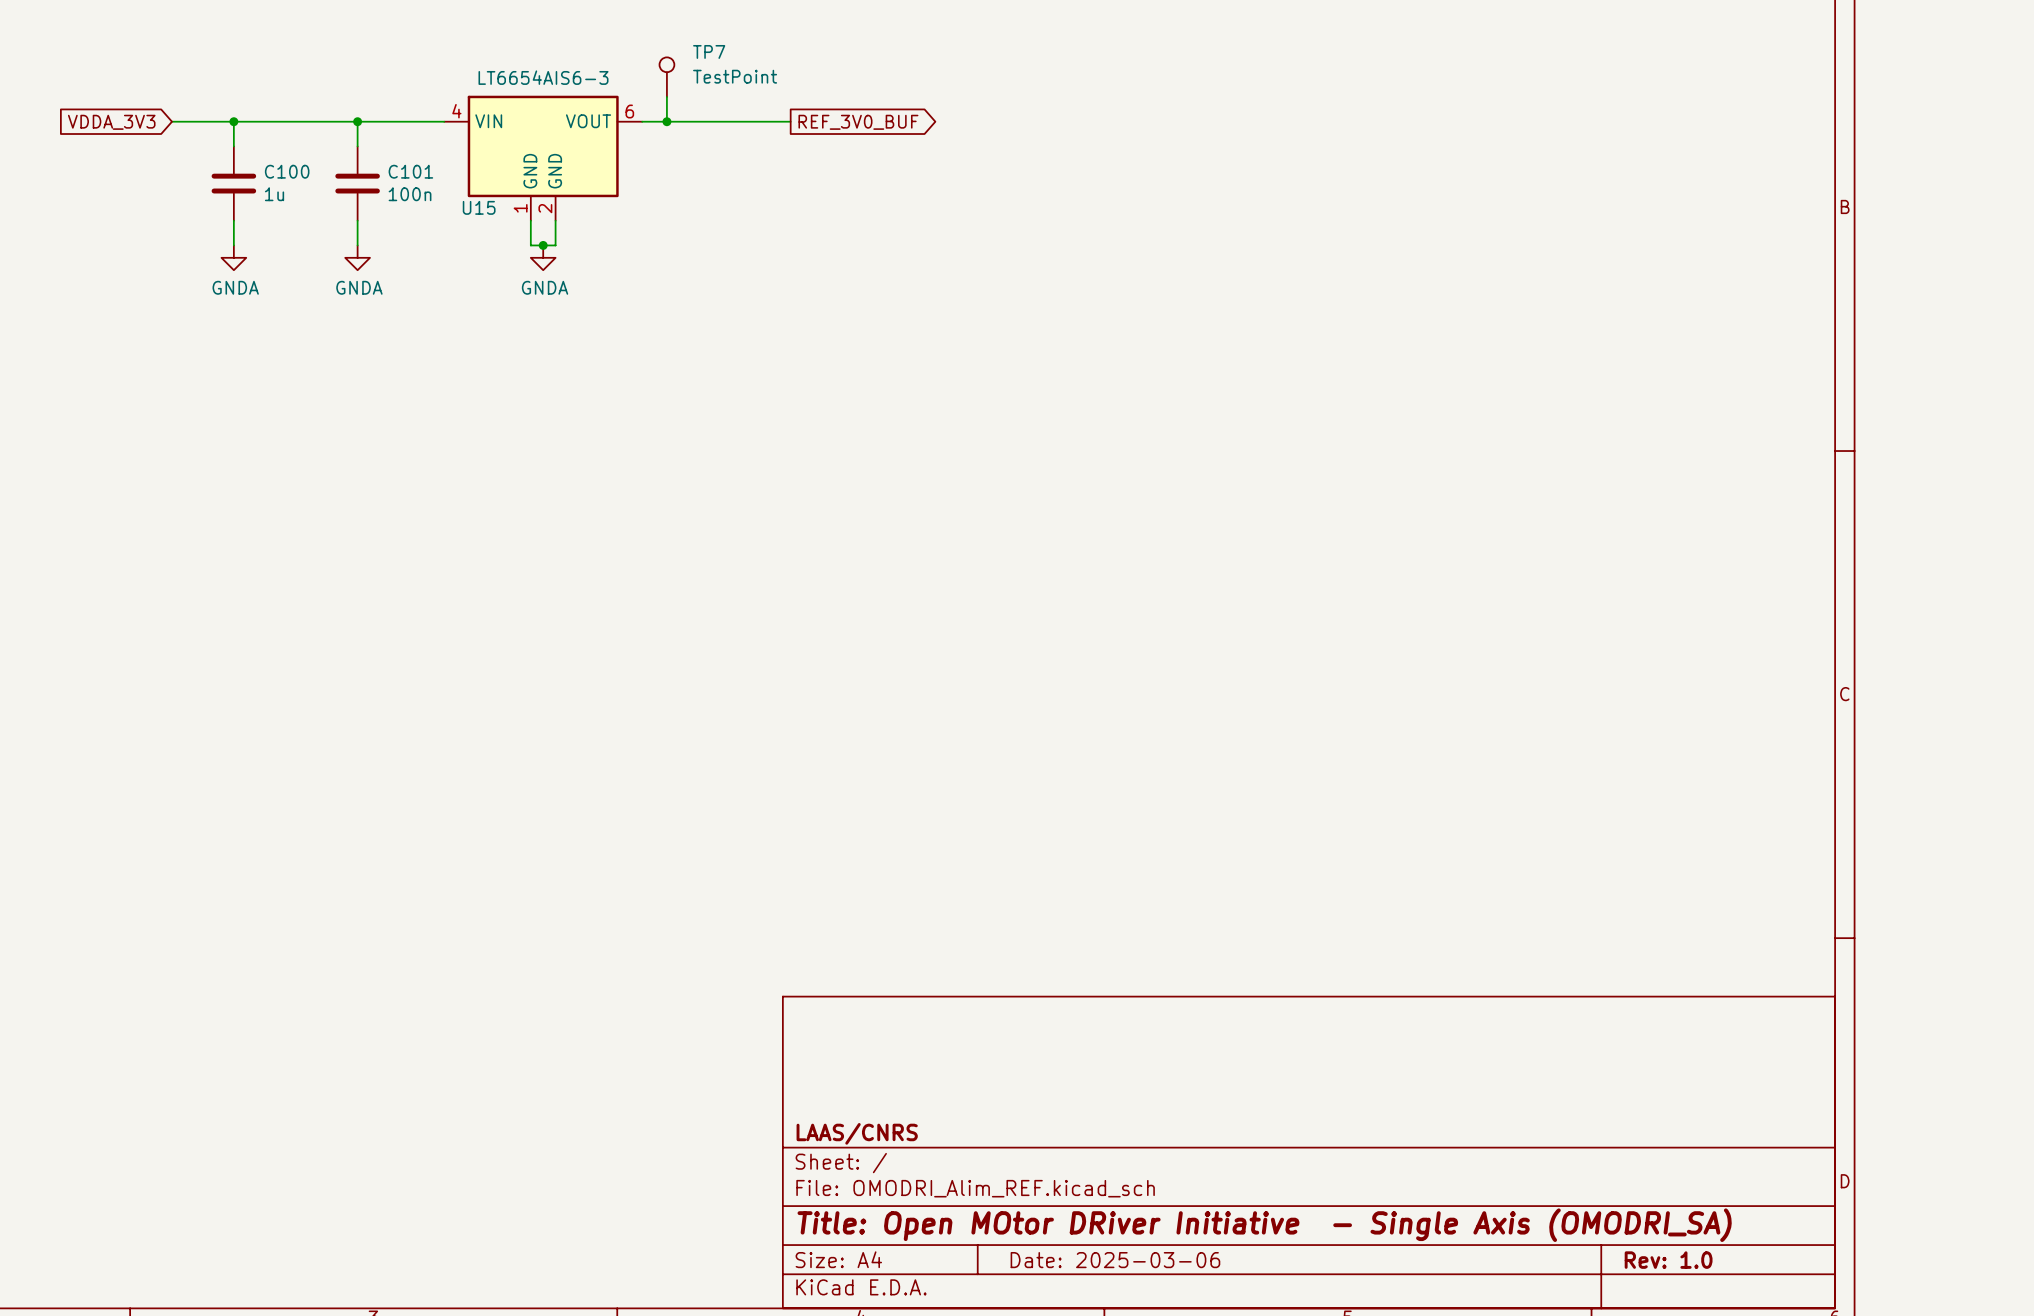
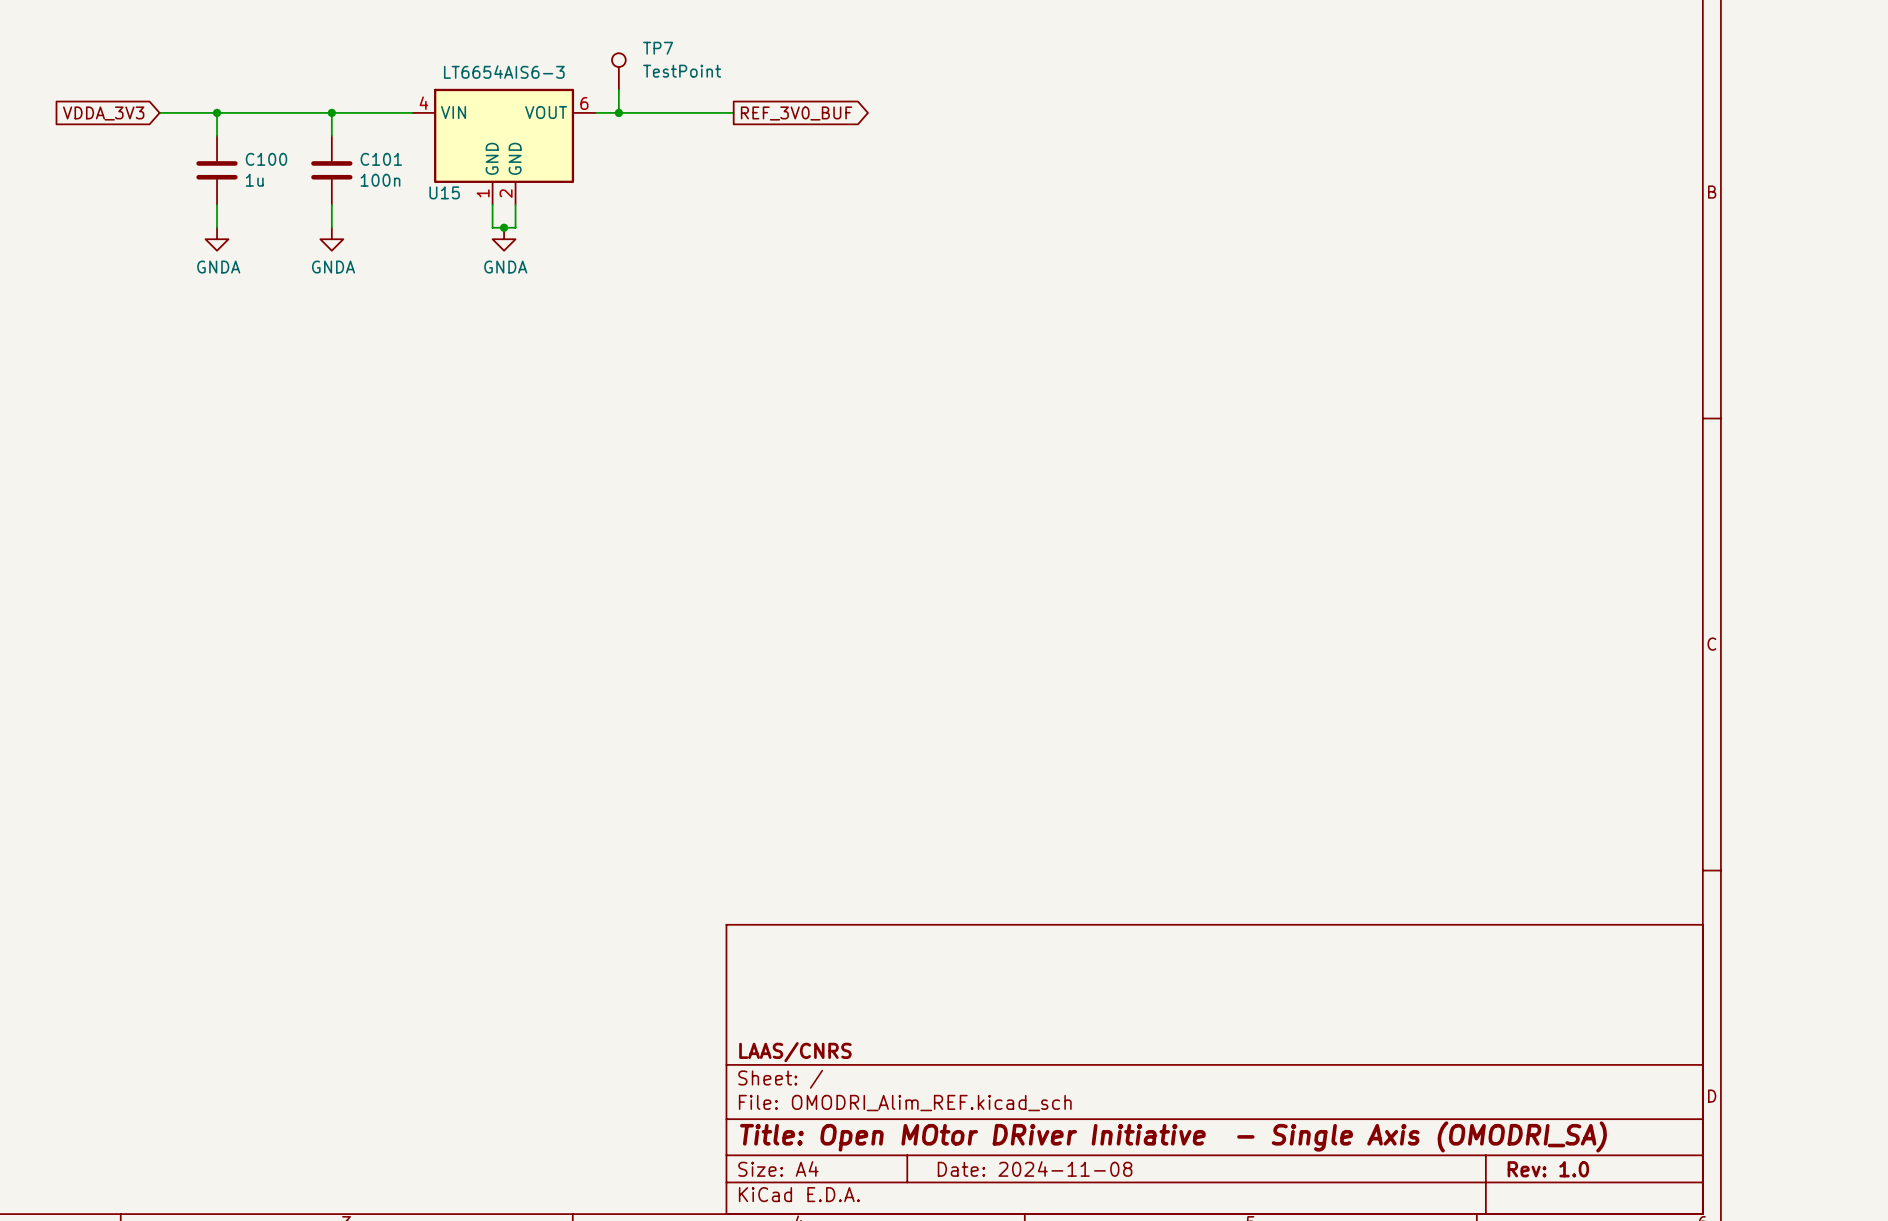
title block: Date: 2025-03-06 (1115, 1260) -> Date: 2024-11-08 (1035, 1168)

